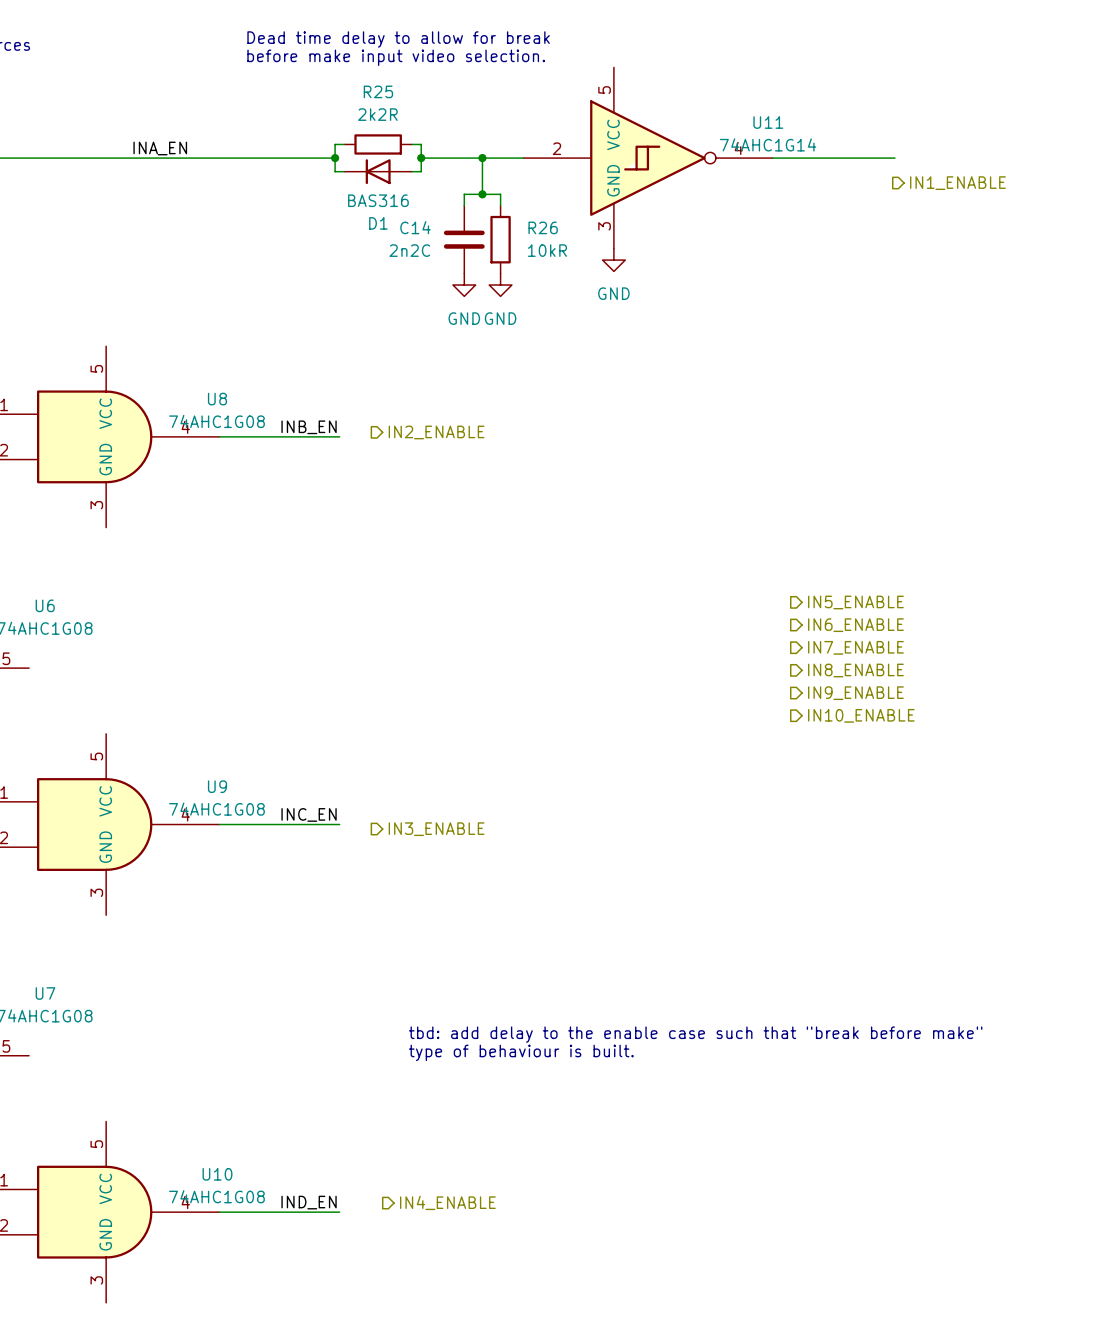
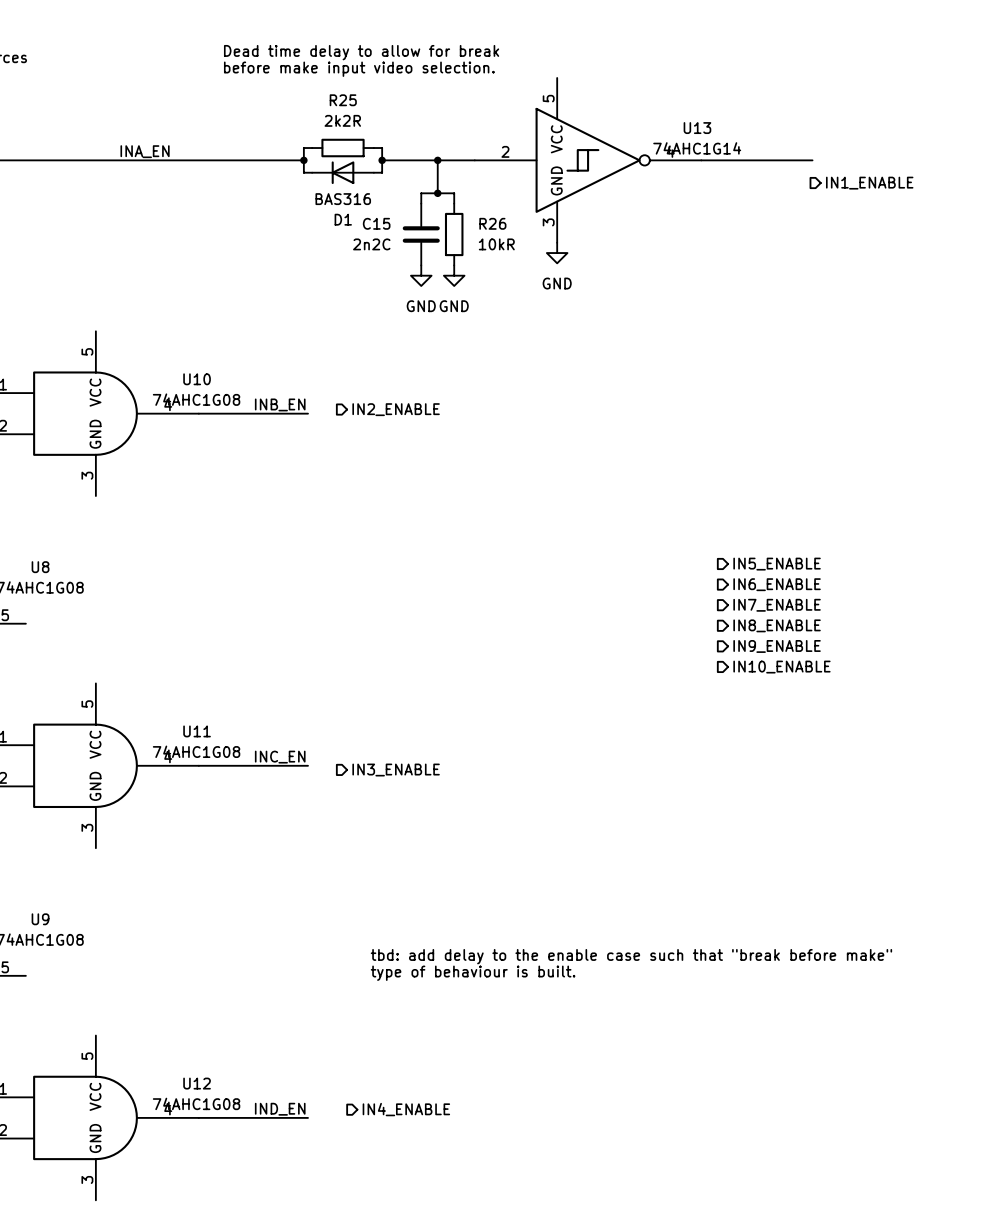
U11 name: U11 (768, 122) -> U13 (697, 128)
C14 name: C14 (415, 227) -> C15 (376, 223)
U8 name: U8 (217, 399) -> U10 (197, 379)
U6 name: U6 (45, 605) -> U8 (40, 567)
U9 name: U9 (217, 786) -> U11 (197, 731)
U7 name: U7 (45, 993) -> U9 (40, 919)
U10 name: U10 (217, 1174) -> U12 (197, 1083)

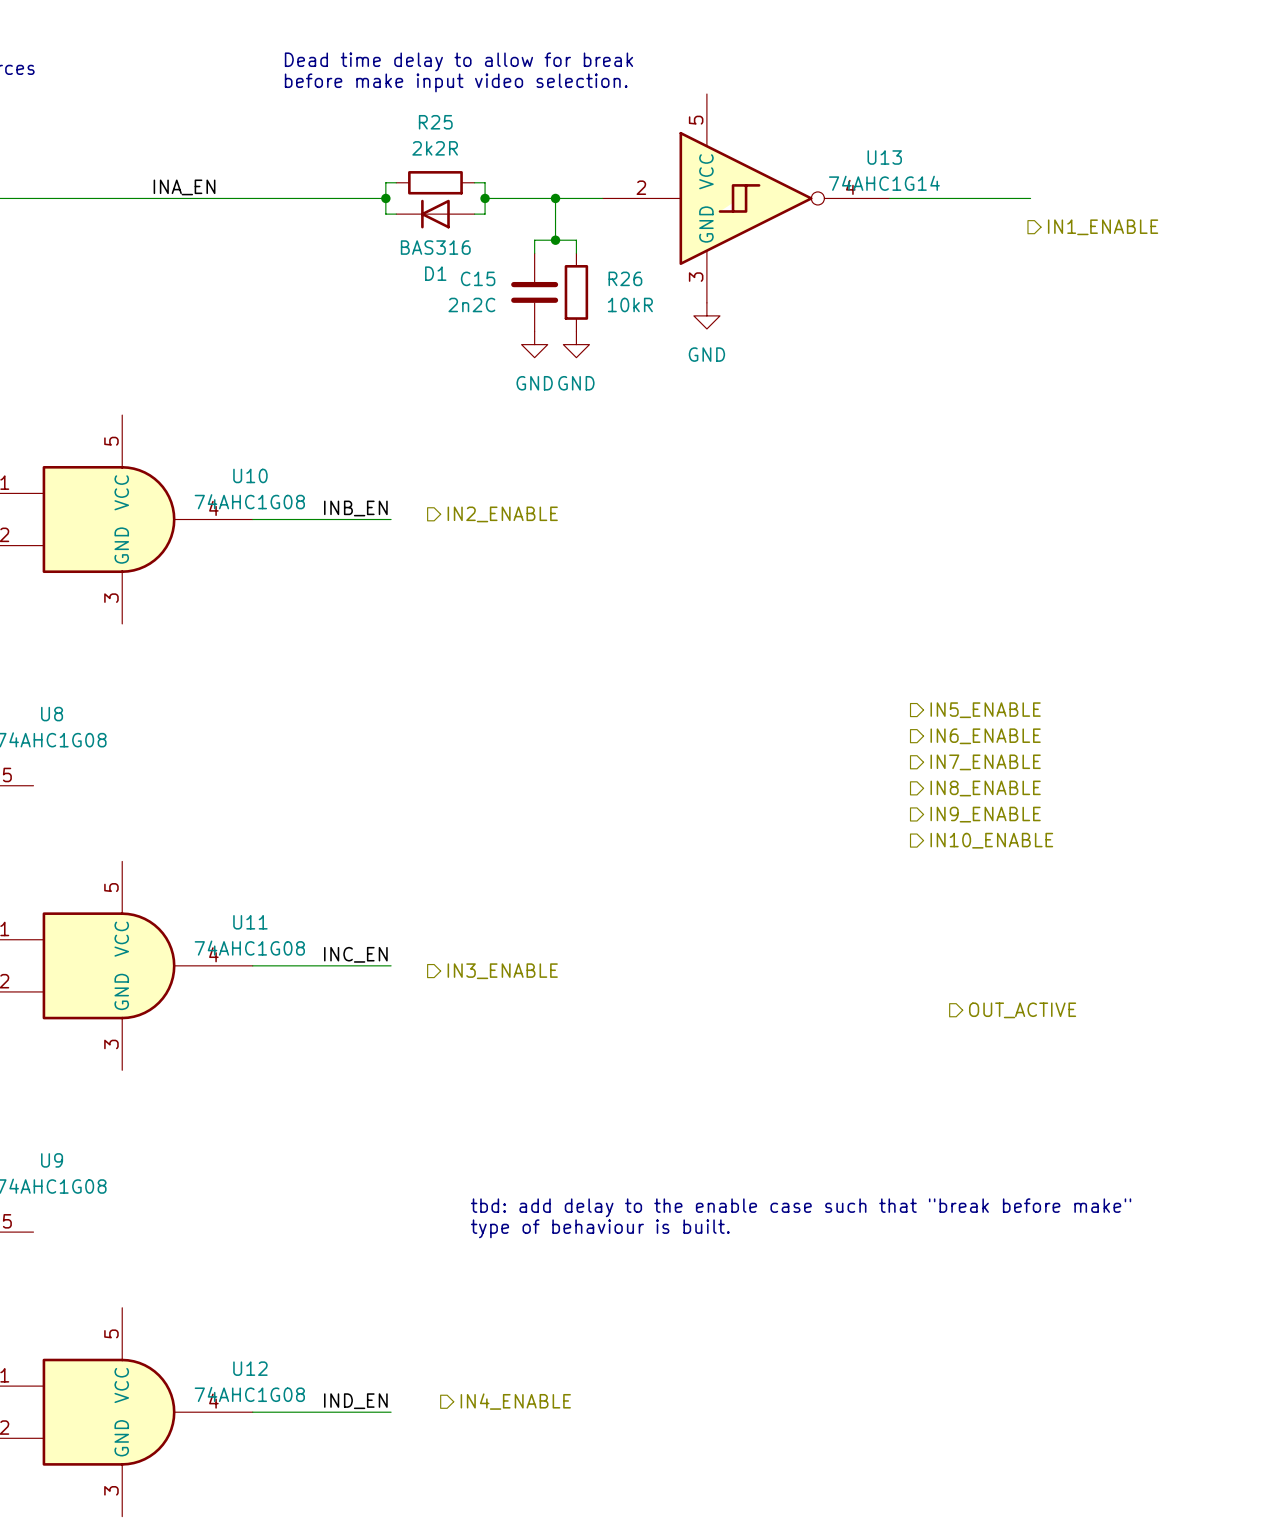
hierarchical label: none -> OUT_ACTIVE (1022, 1010)

